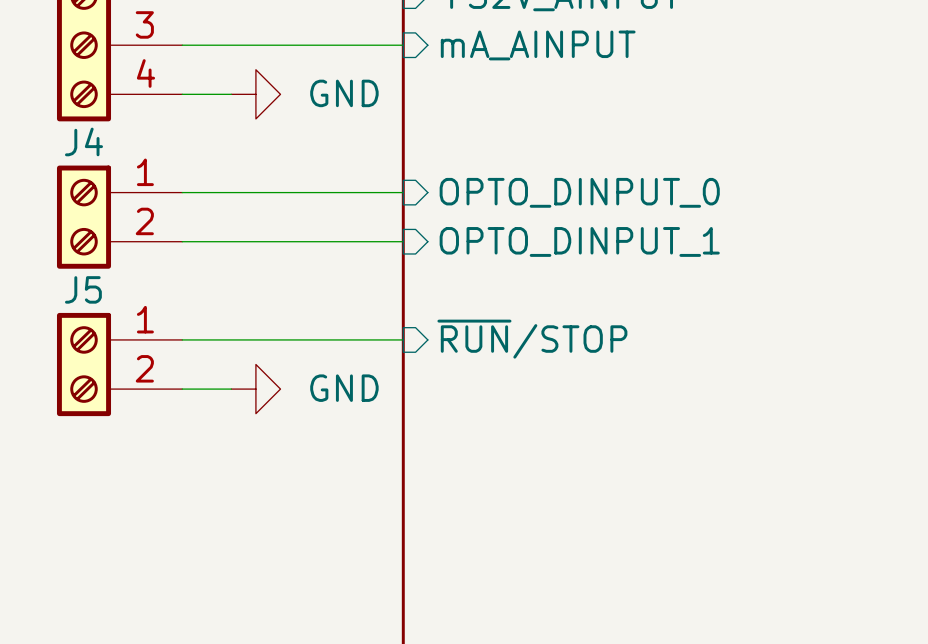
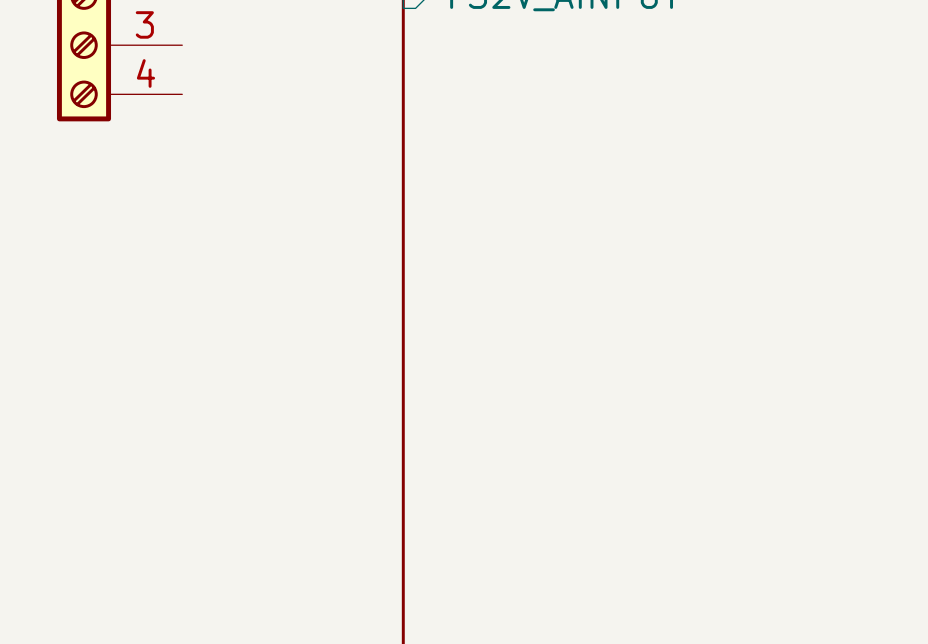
wire: (182, 45) (403, 45) -> none
sheet pin: mA_AINPUT (538, 45) -> none
wire: (182, 94) (231, 94) -> none
power symbol: GND (255, 94) -> none
wire: (182, 192) (403, 192) -> none
sheet pin: OPTO_DINPUT_0 (579, 192) -> none
J4: (119, 217) -> none
wire: (182, 241) (403, 241) -> none
sheet pin: OPTO_DINPUT_1 (579, 241) -> none
wire: (182, 339) (403, 339) -> none
sheet pin: ~{RUN}/STOP (532, 339) -> none
J5: (119, 364) -> none
wire: (182, 389) (231, 389) -> none
power symbol: GND (255, 389) -> none

